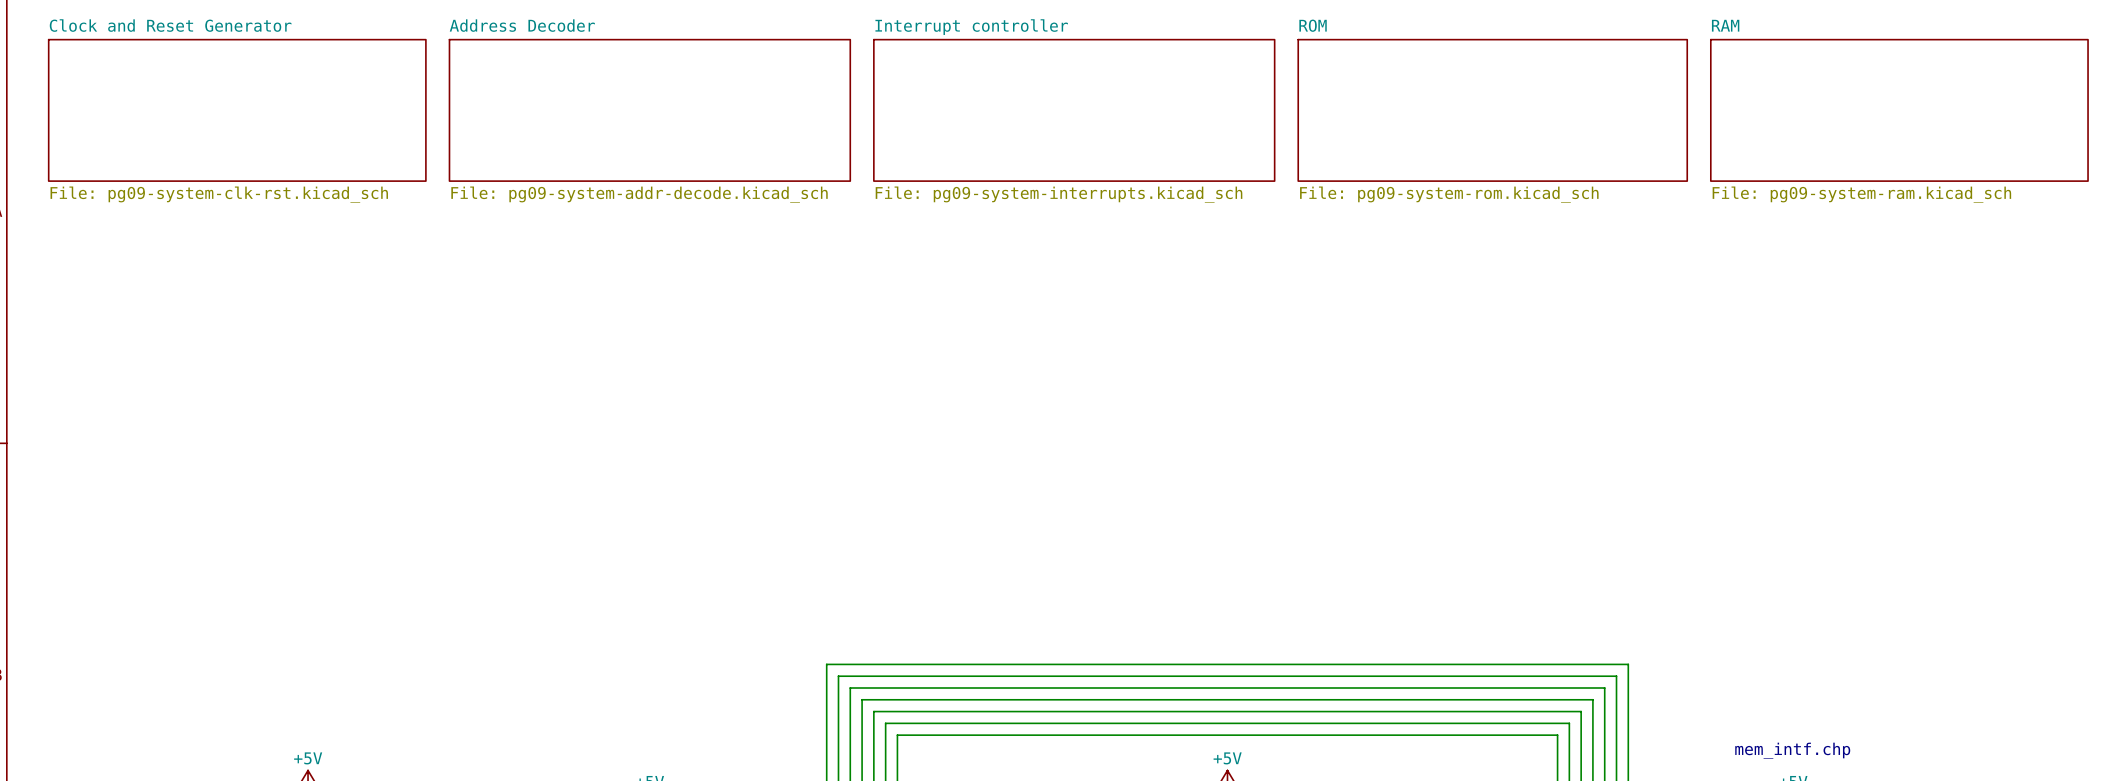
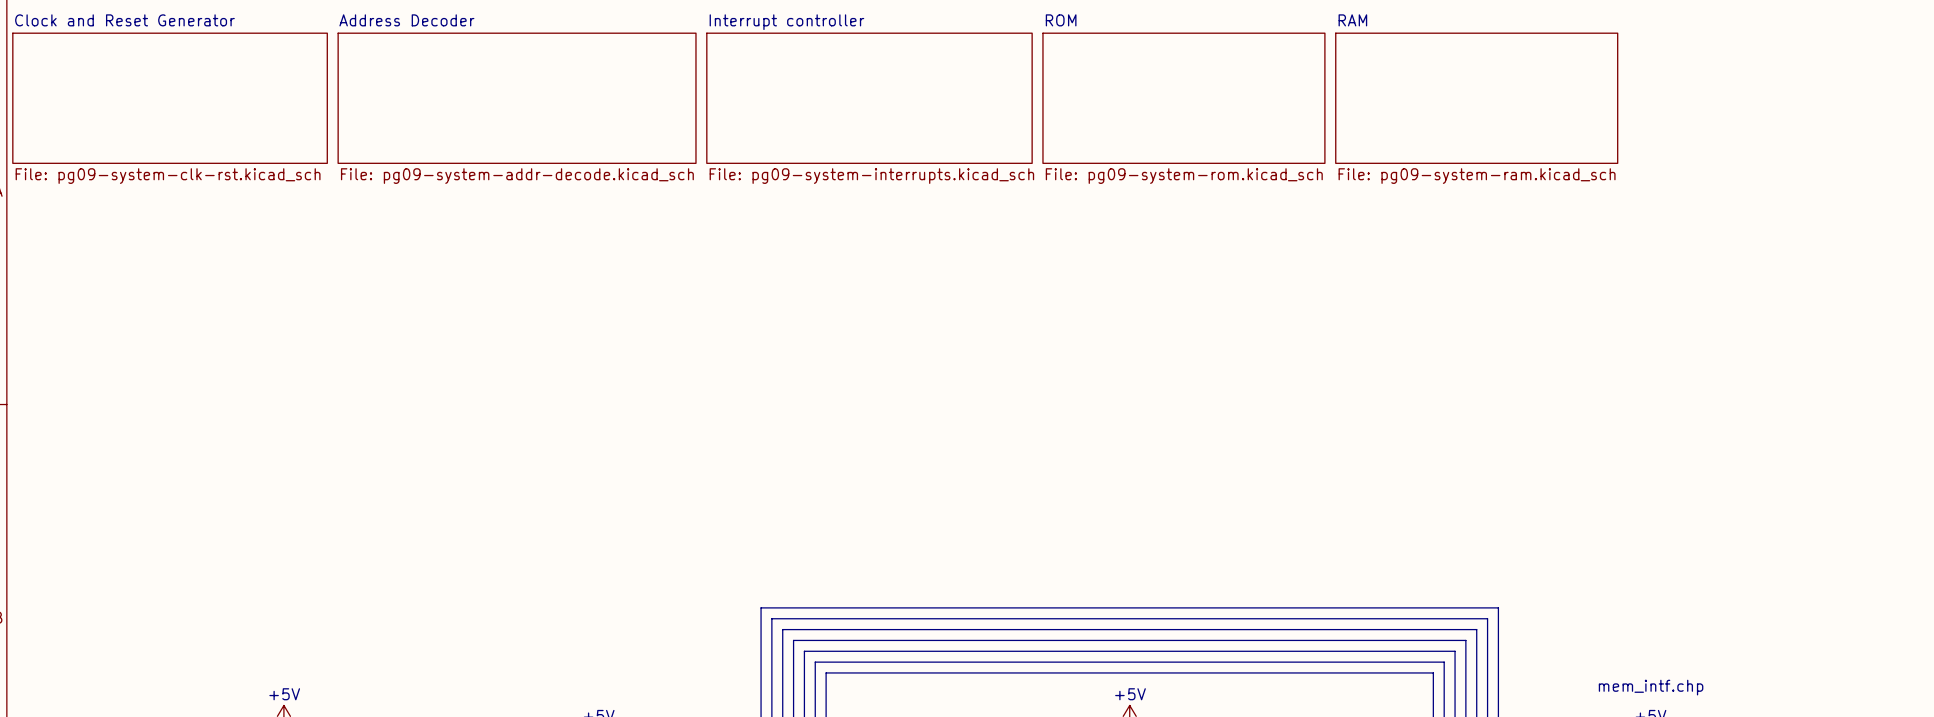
sheet Clock and Reset Generator: none -> File: pg09-system-clk-rst.kicad_sch (170, 98)
sheet Clock and Reset Generator: File: pg09-system-clk-rst.kicad_sch (237, 110) -> none
sheet Address Decoder: none -> File: pg09-system-addr-decode.kicad_sch (517, 98)
sheet Address Decoder: File: pg09-system-addr-decode.kicad_sch (649, 110) -> none
sheet Interrupt controller: none -> File: pg09-system-interrupts.kicad_sch (869, 98)
sheet Interrupt controller: File: pg09-system-interrupts.kicad_sch (1074, 110) -> none
sheet ROM: none -> File: pg09-system-rom.kicad_sch (1183, 98)
sheet ROM: File: pg09-system-rom.kicad_sch (1492, 110) -> none
sheet RAM: none -> File: pg09-system-ram.kicad_sch (1476, 98)
sheet RAM: File: pg09-system-ram.kicad_sch (1899, 110) -> none

